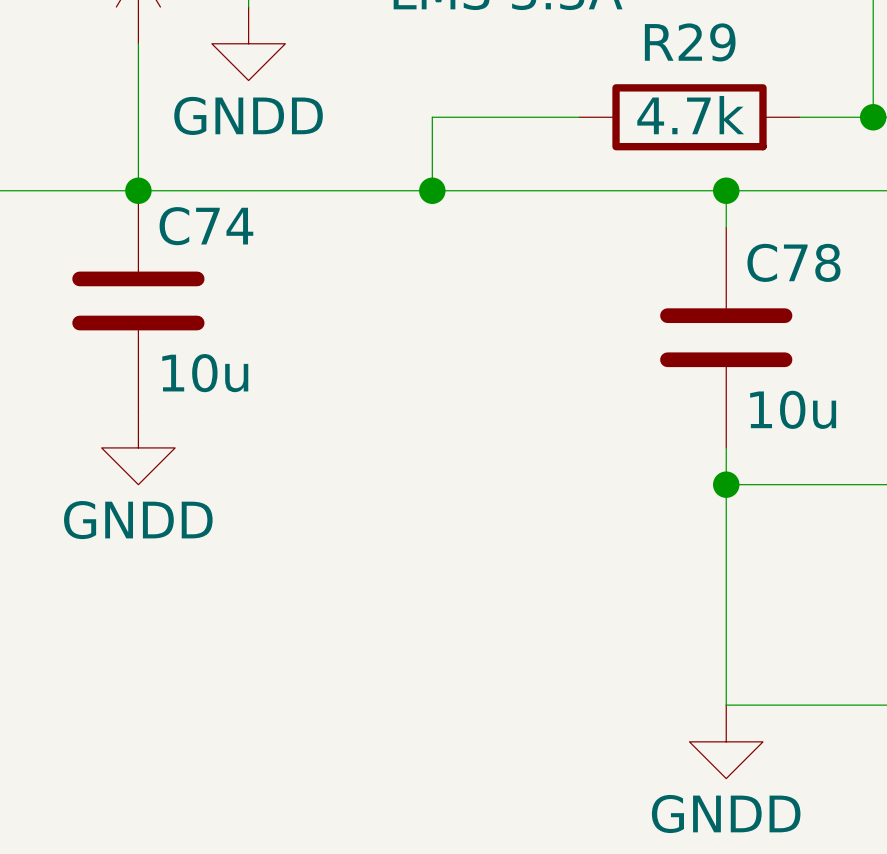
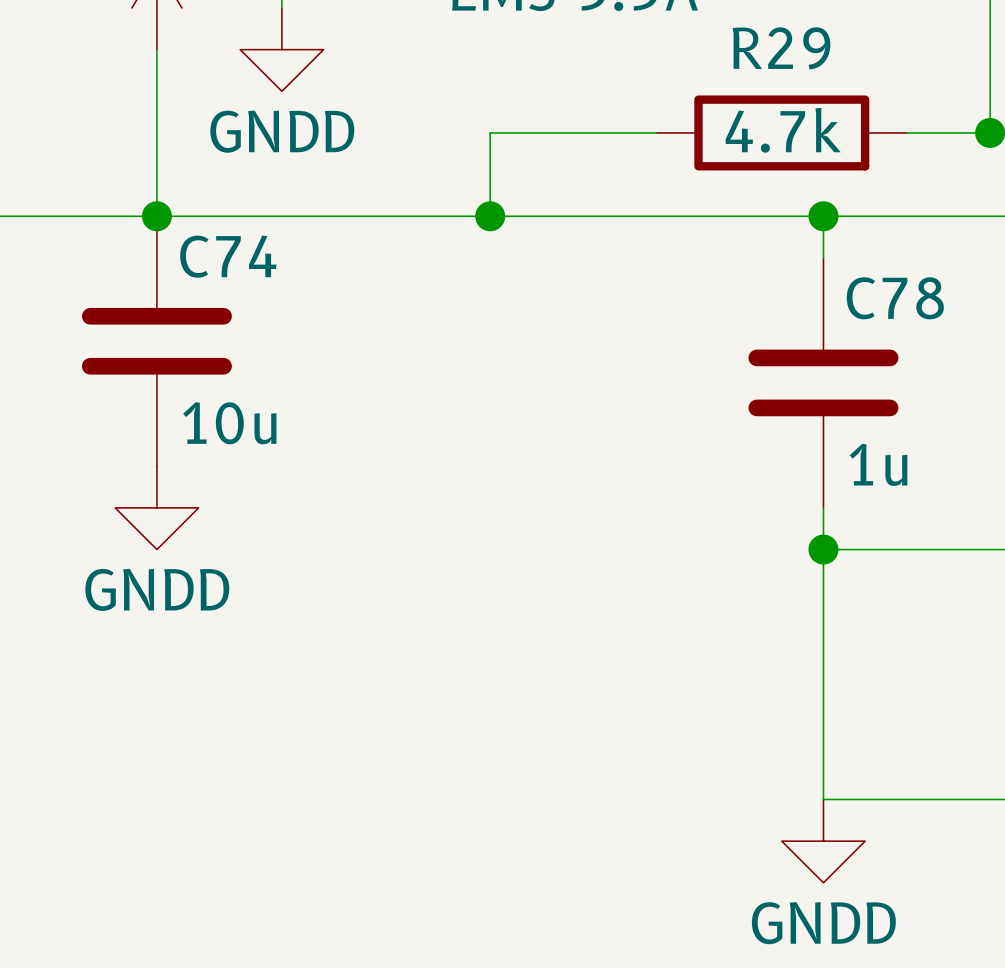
C78 value: 10u (793, 409) -> 1u (878, 464)

